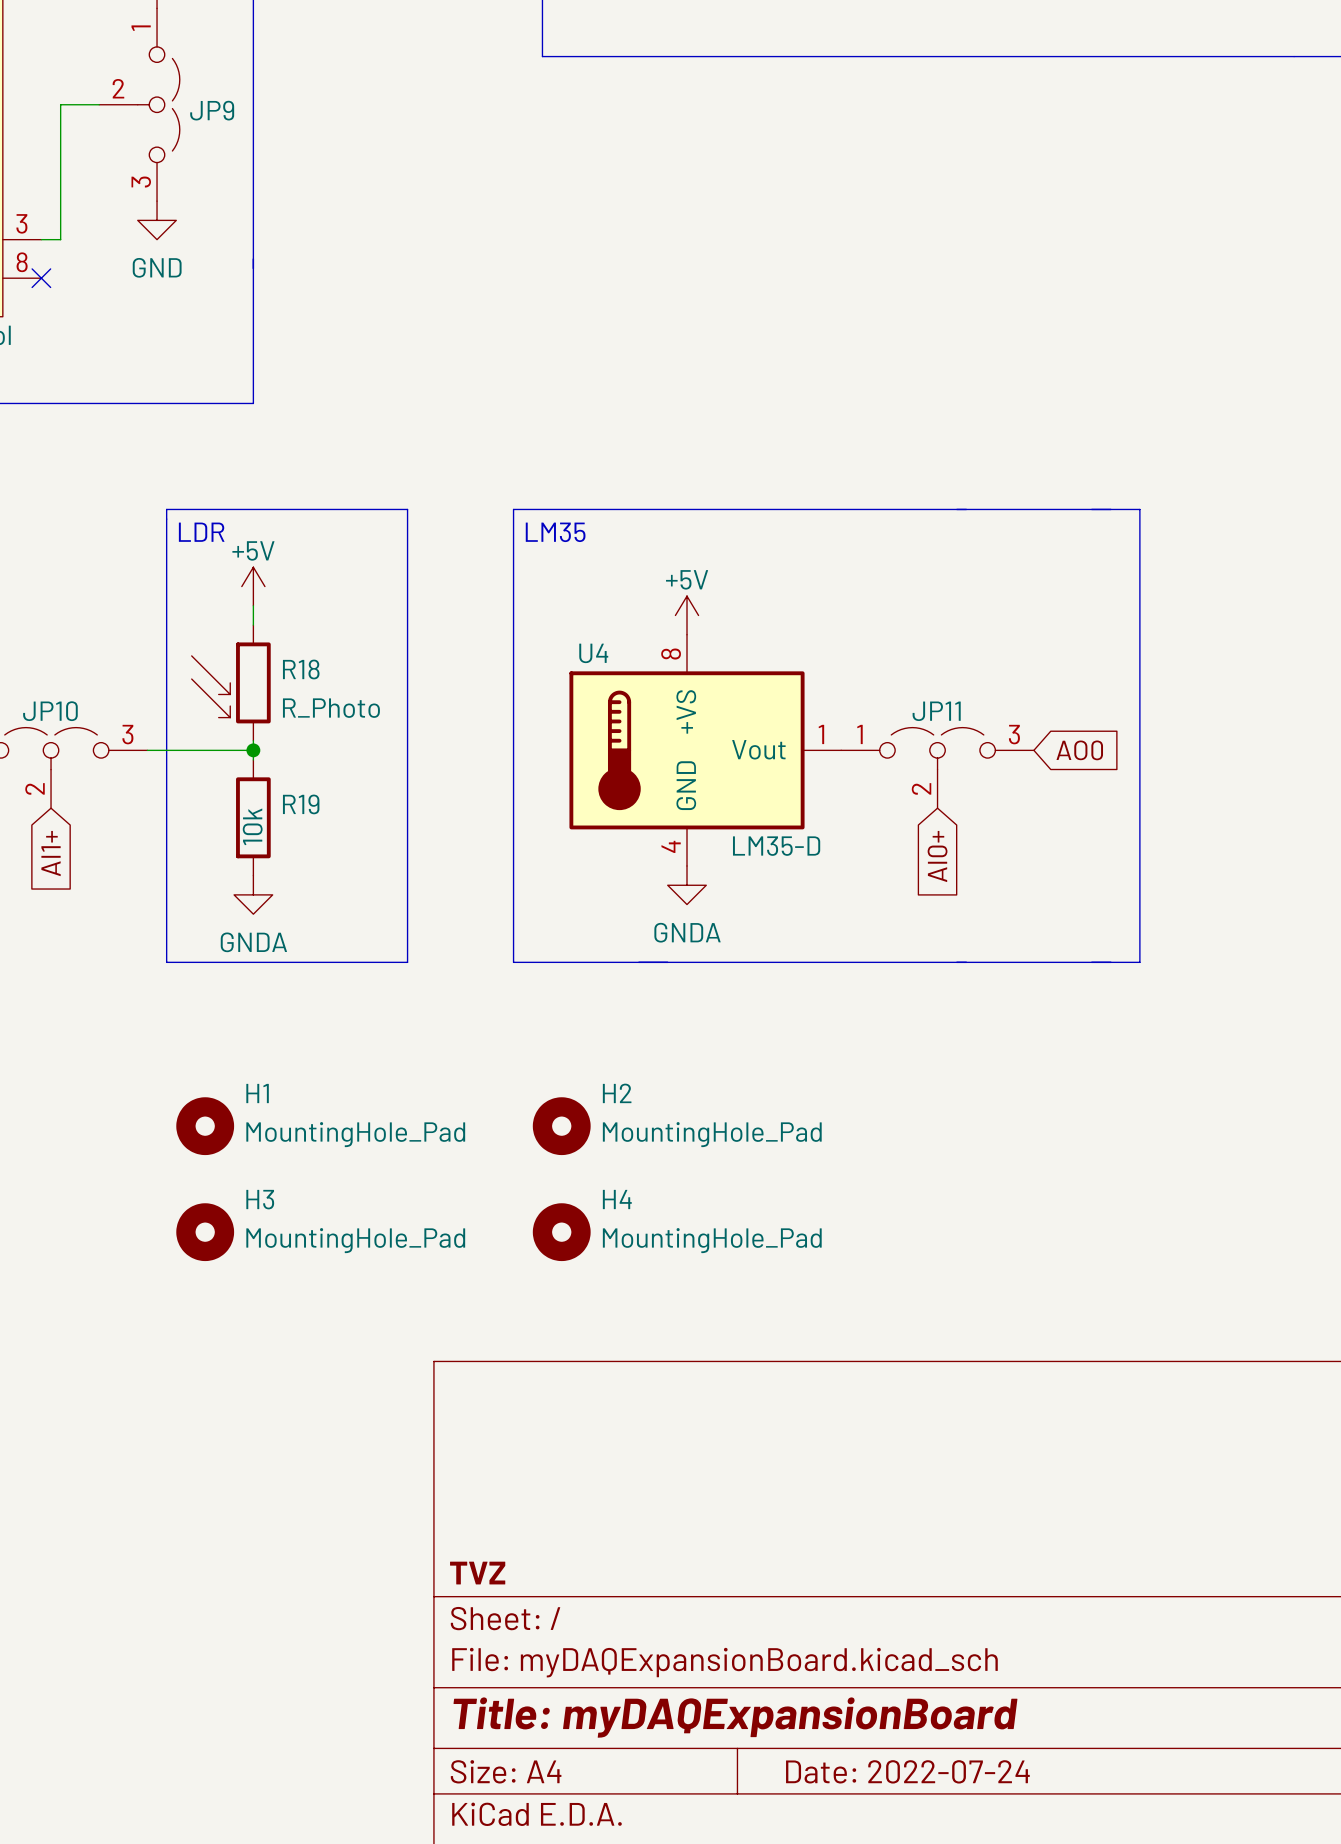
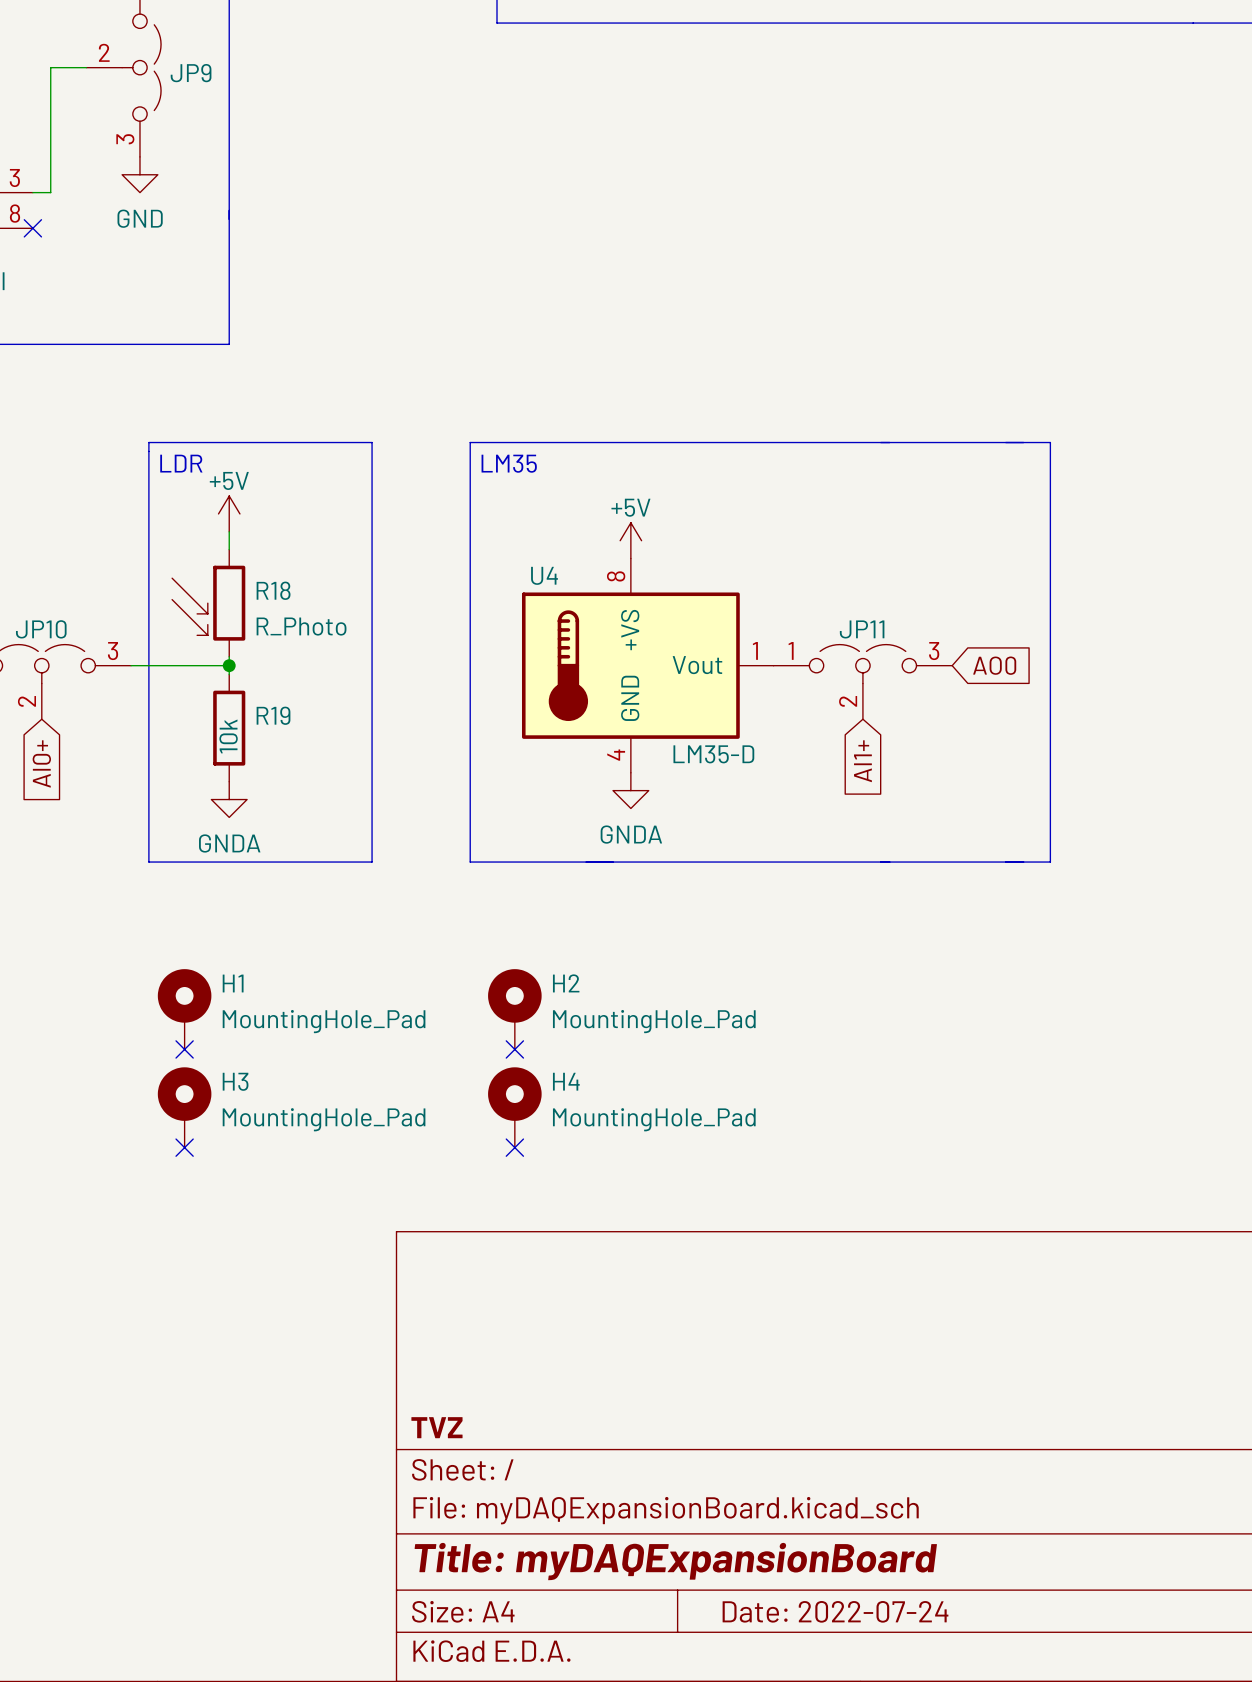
global label: AI1+ (51, 853) -> AI0+ (41, 764)
global label: AI0+ (937, 856) -> AI1+ (862, 761)
H1 symbol: [176, 1097, 235, 1156] -> [157, 969, 212, 1050]
H2 symbol: [532, 1097, 591, 1156] -> [488, 969, 542, 1050]
no-connect mark: none -> (184, 1049)
no-connect mark: none -> (514, 1049)
H3 symbol: [176, 1203, 235, 1262] -> [157, 1067, 212, 1148]
H4 symbol: [532, 1203, 591, 1262] -> [488, 1067, 542, 1148]
no-connect mark: none -> (184, 1147)
no-connect mark: none -> (514, 1147)

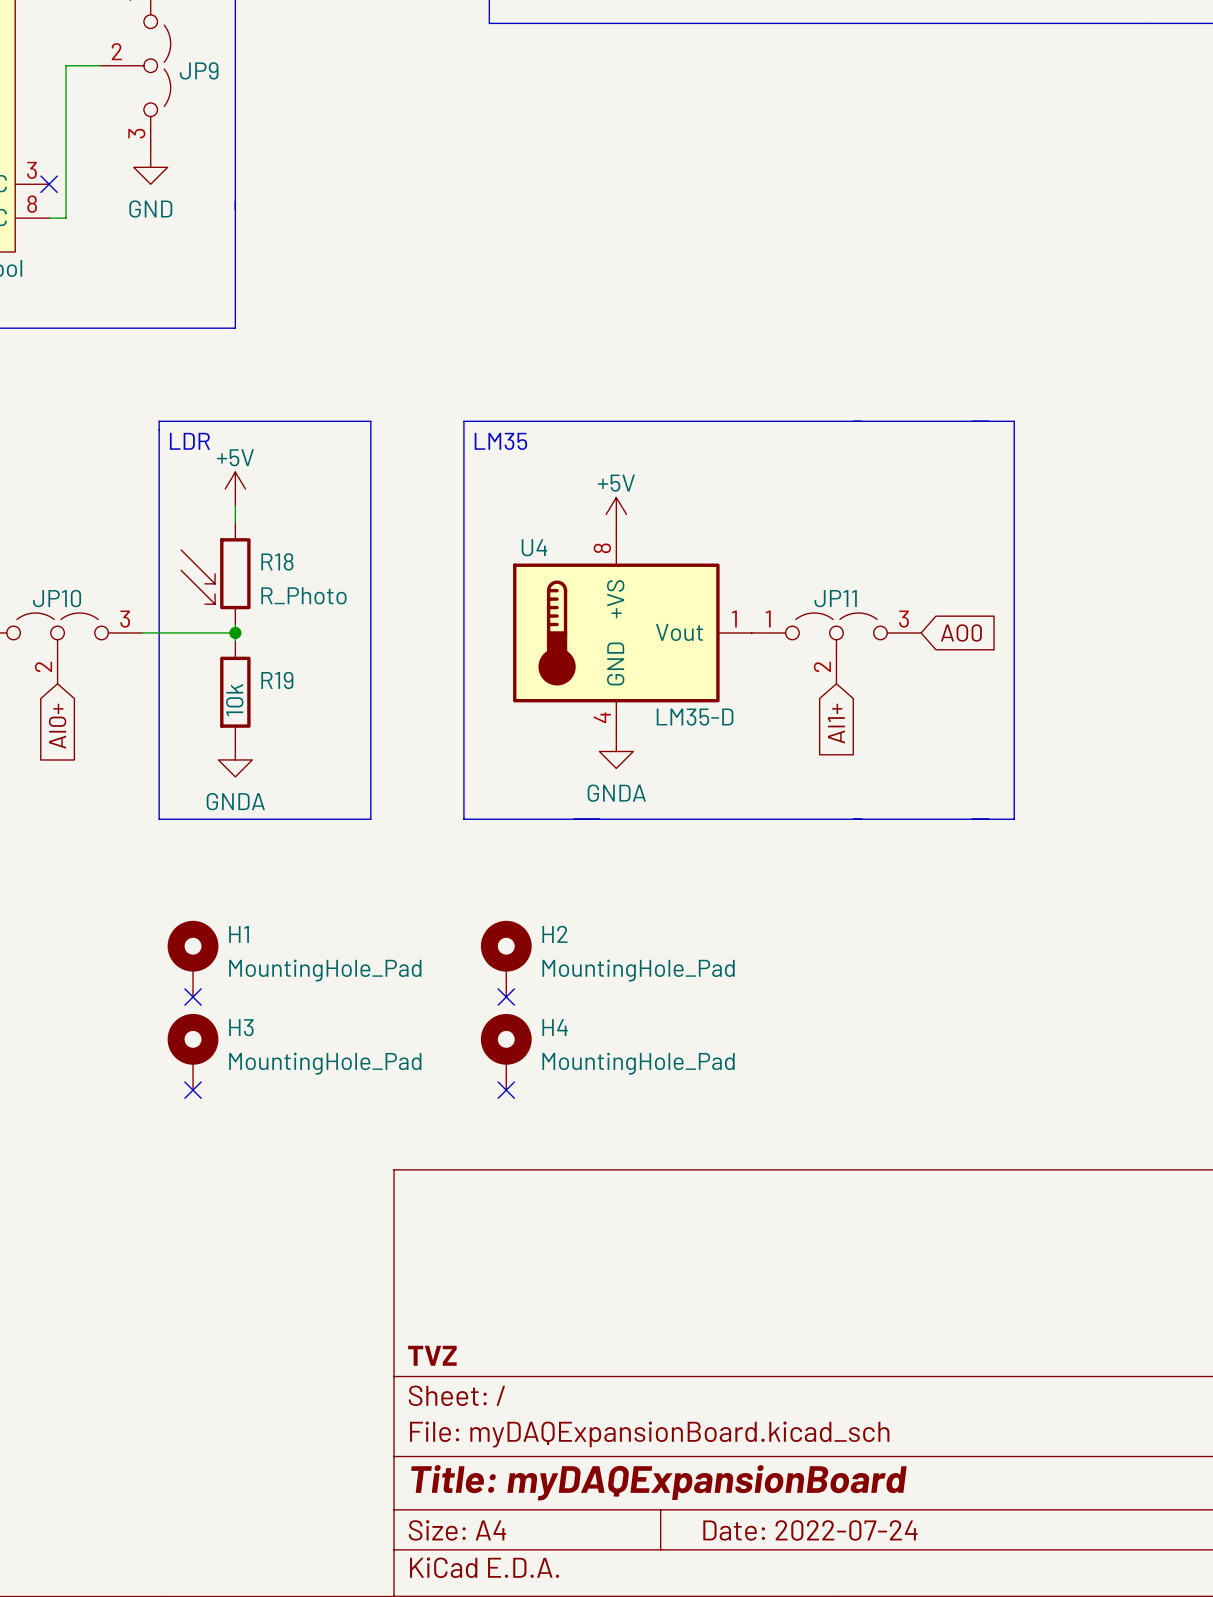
wire: (32, 192) (50, 192) -> (49, 218) (66, 218) (66, 184)
no-connect mark position: (32, 228) -> (49, 184)

